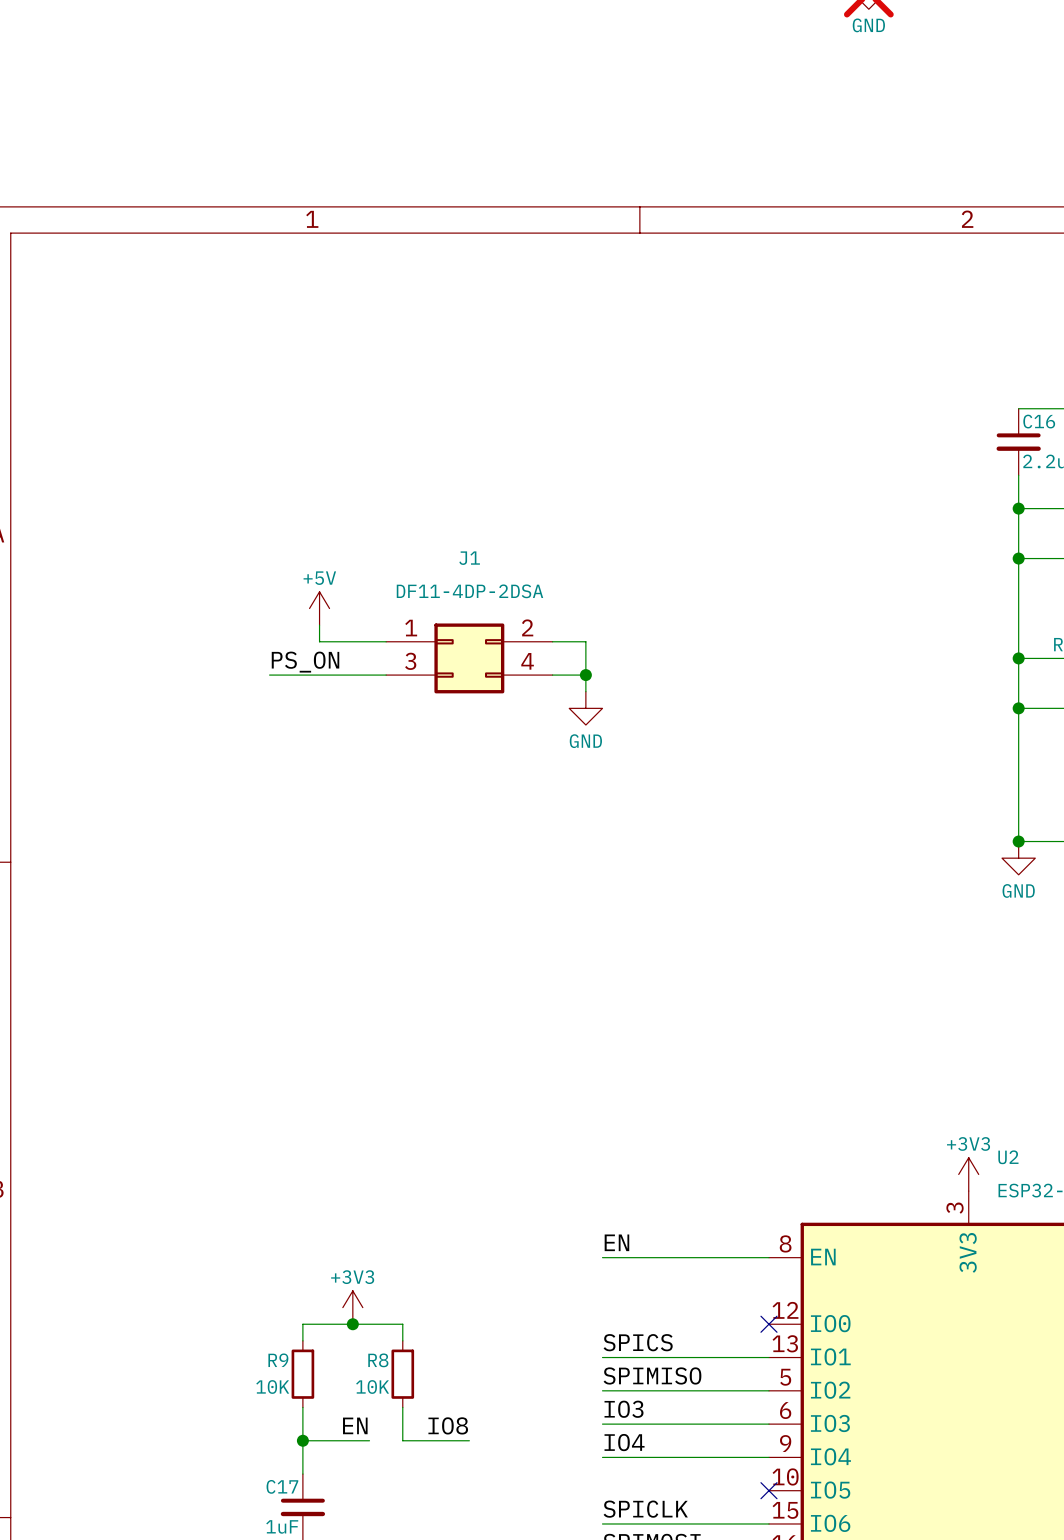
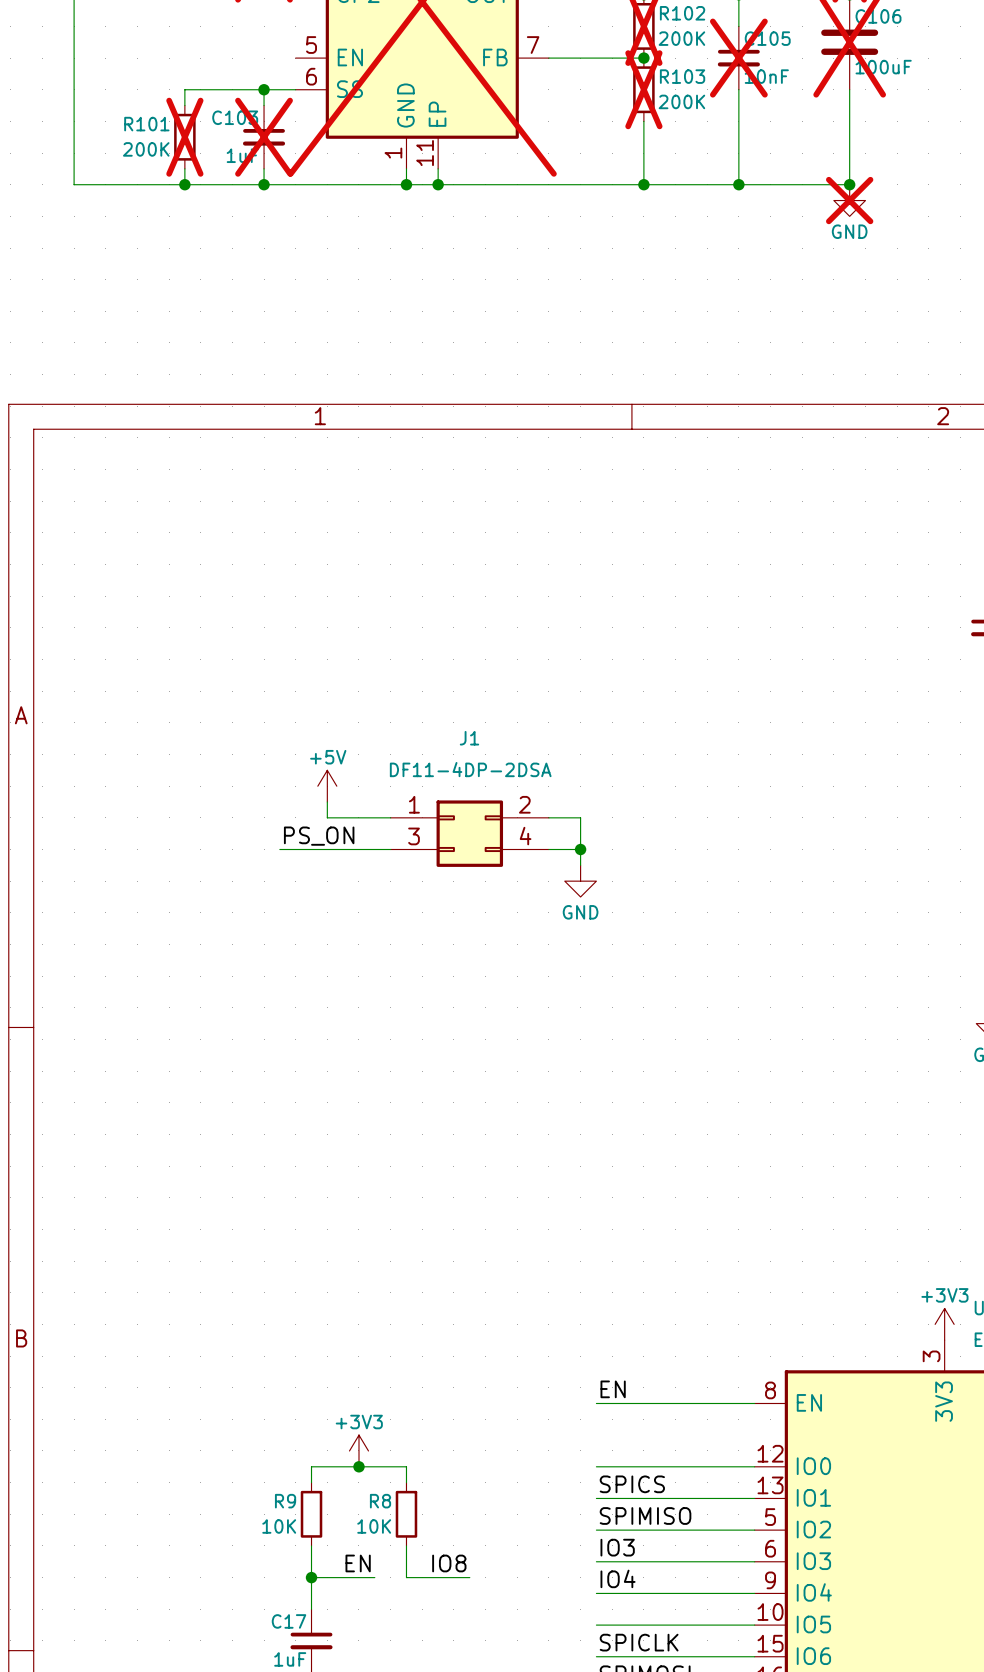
wire: none -> (596, 1466) (754, 1466)
no-connect mark: (768, 1324) -> none
wire: none -> (596, 1625) (754, 1625)
no-connect mark: (768, 1490) -> none

